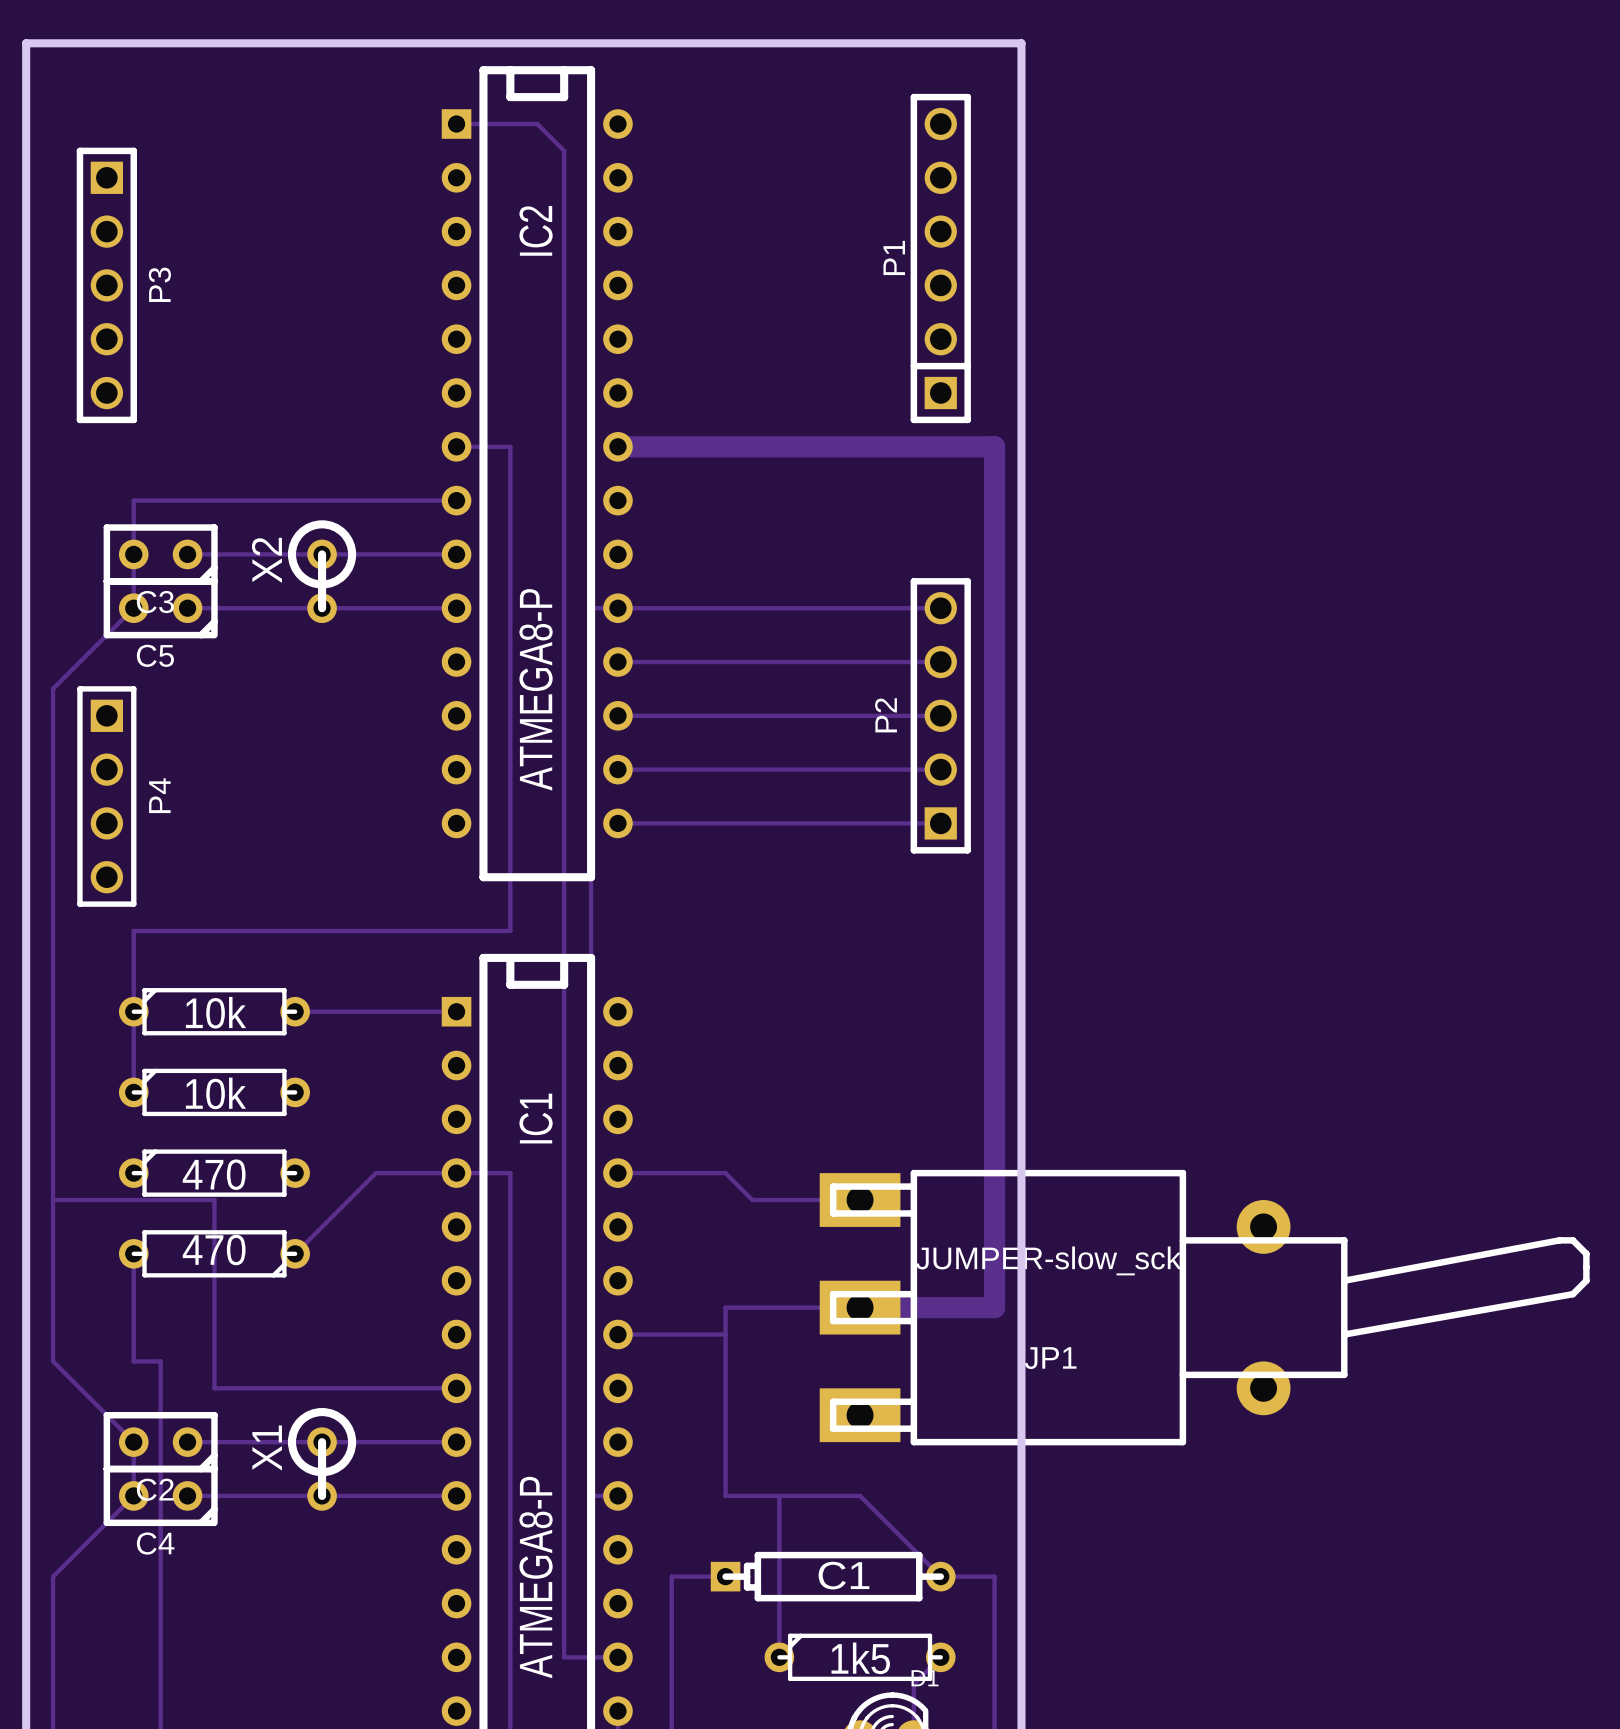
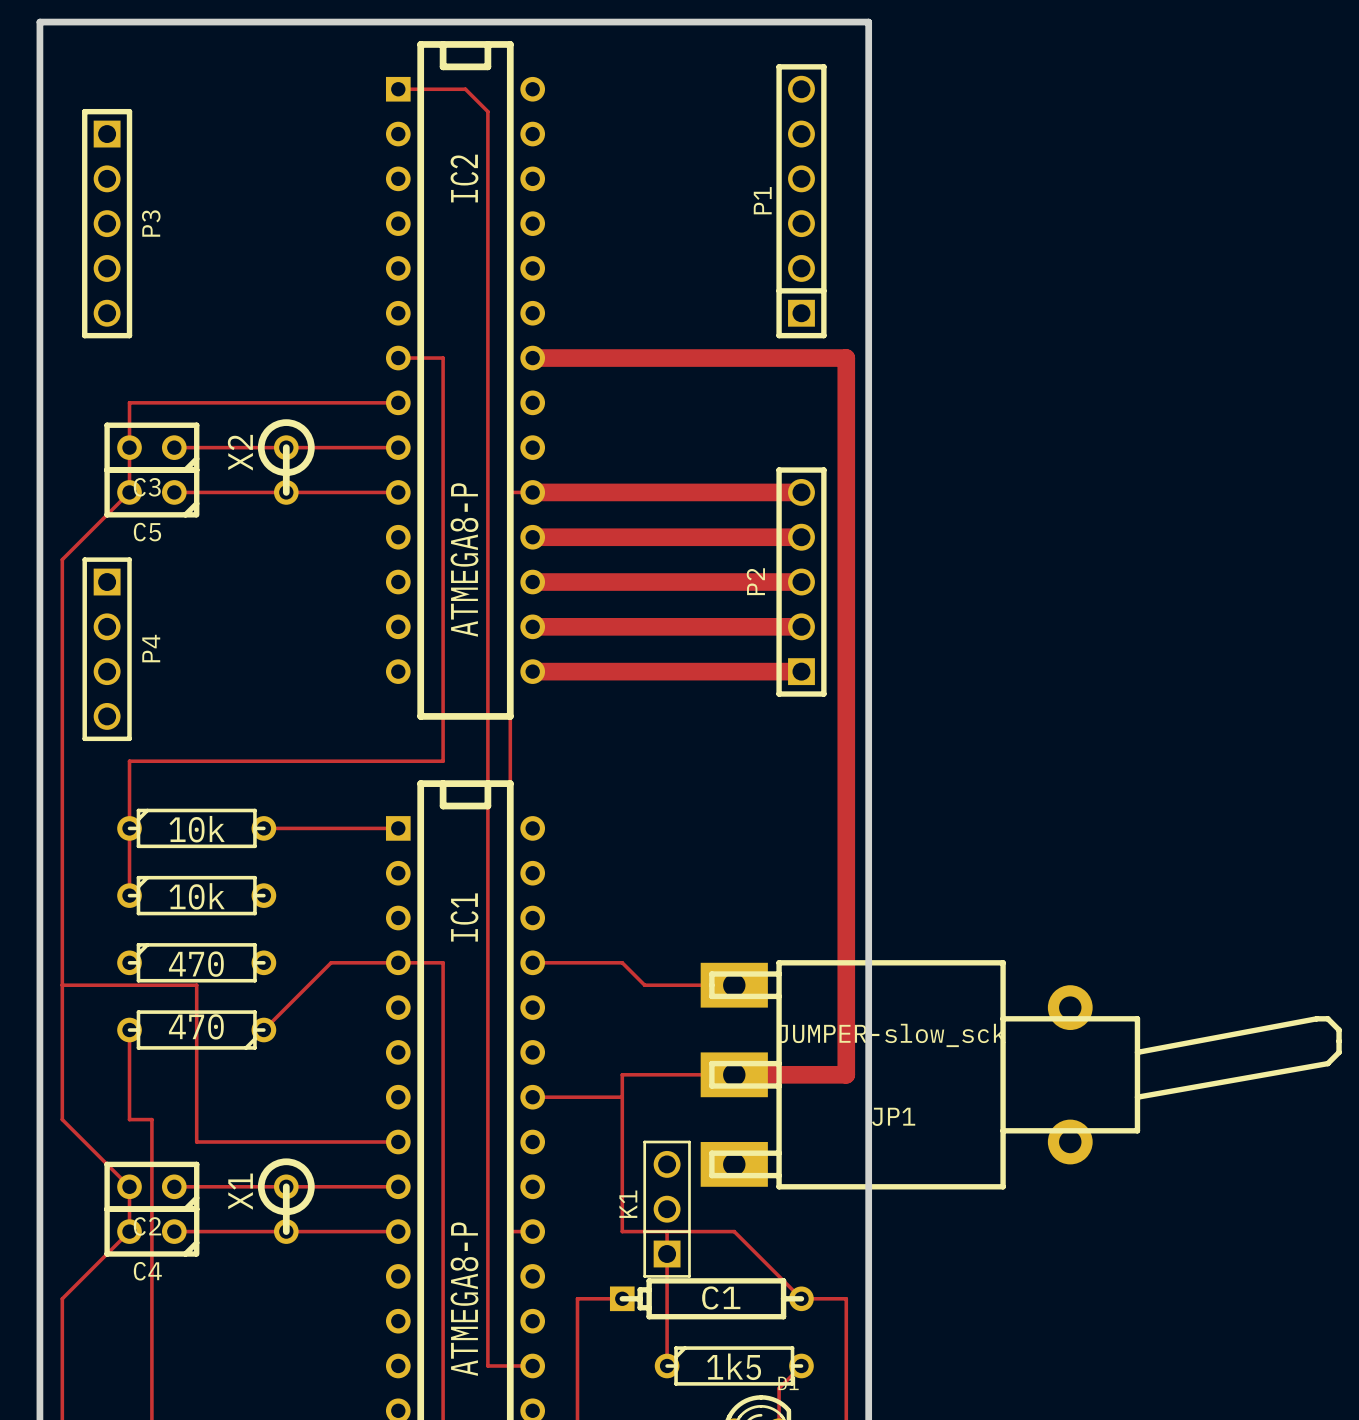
track width: thin (617, 608) (940, 608) -> thick (532, 492) (801, 492)
track width: thin (617, 662) (940, 662) -> thick (532, 537) (801, 537)
track width: thin (617, 715) (940, 715) -> thick (532, 582) (801, 582)
track width: thin (617, 769) (940, 769) -> thick (532, 626) (801, 626)
track width: thin (617, 823) (940, 823) -> thick (532, 671) (801, 671)
K1: none -> (667, 1209)

